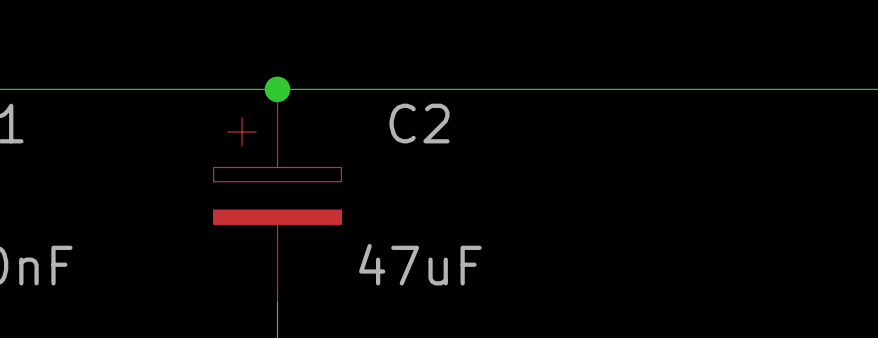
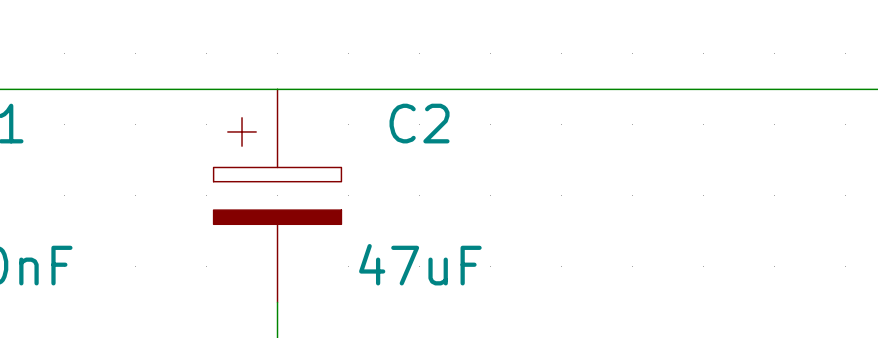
junction: (277, 89) -> none

